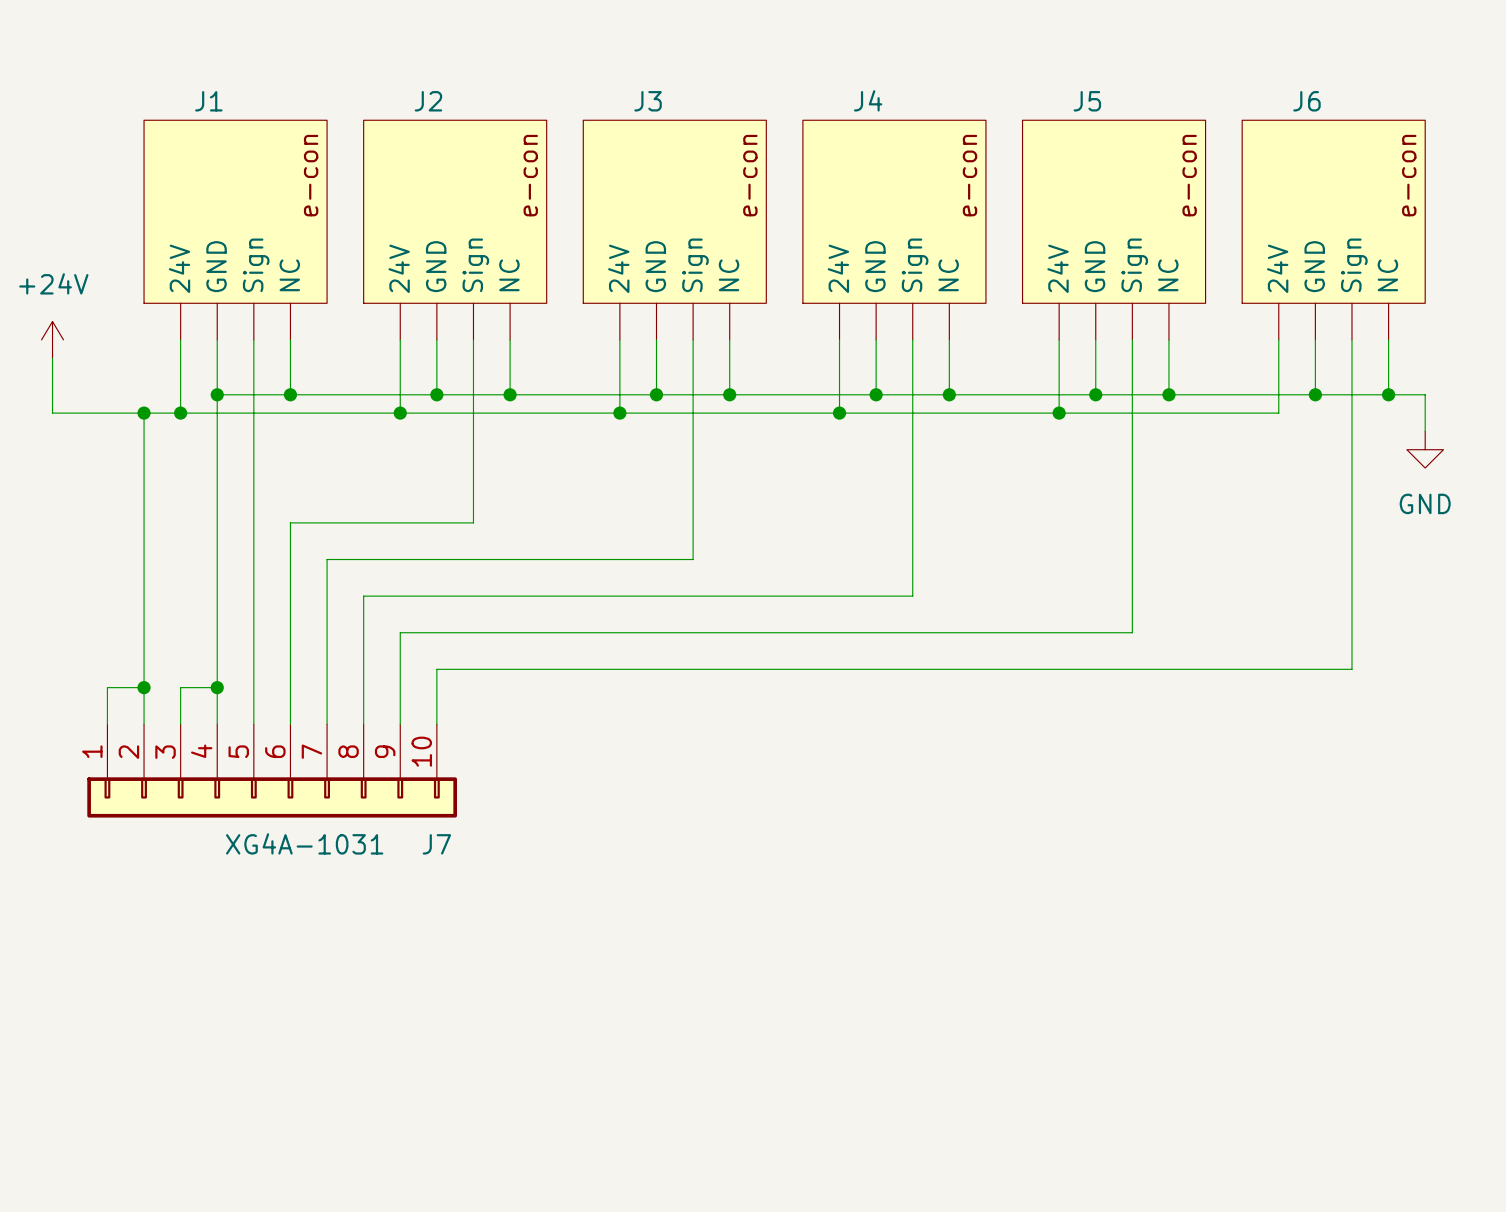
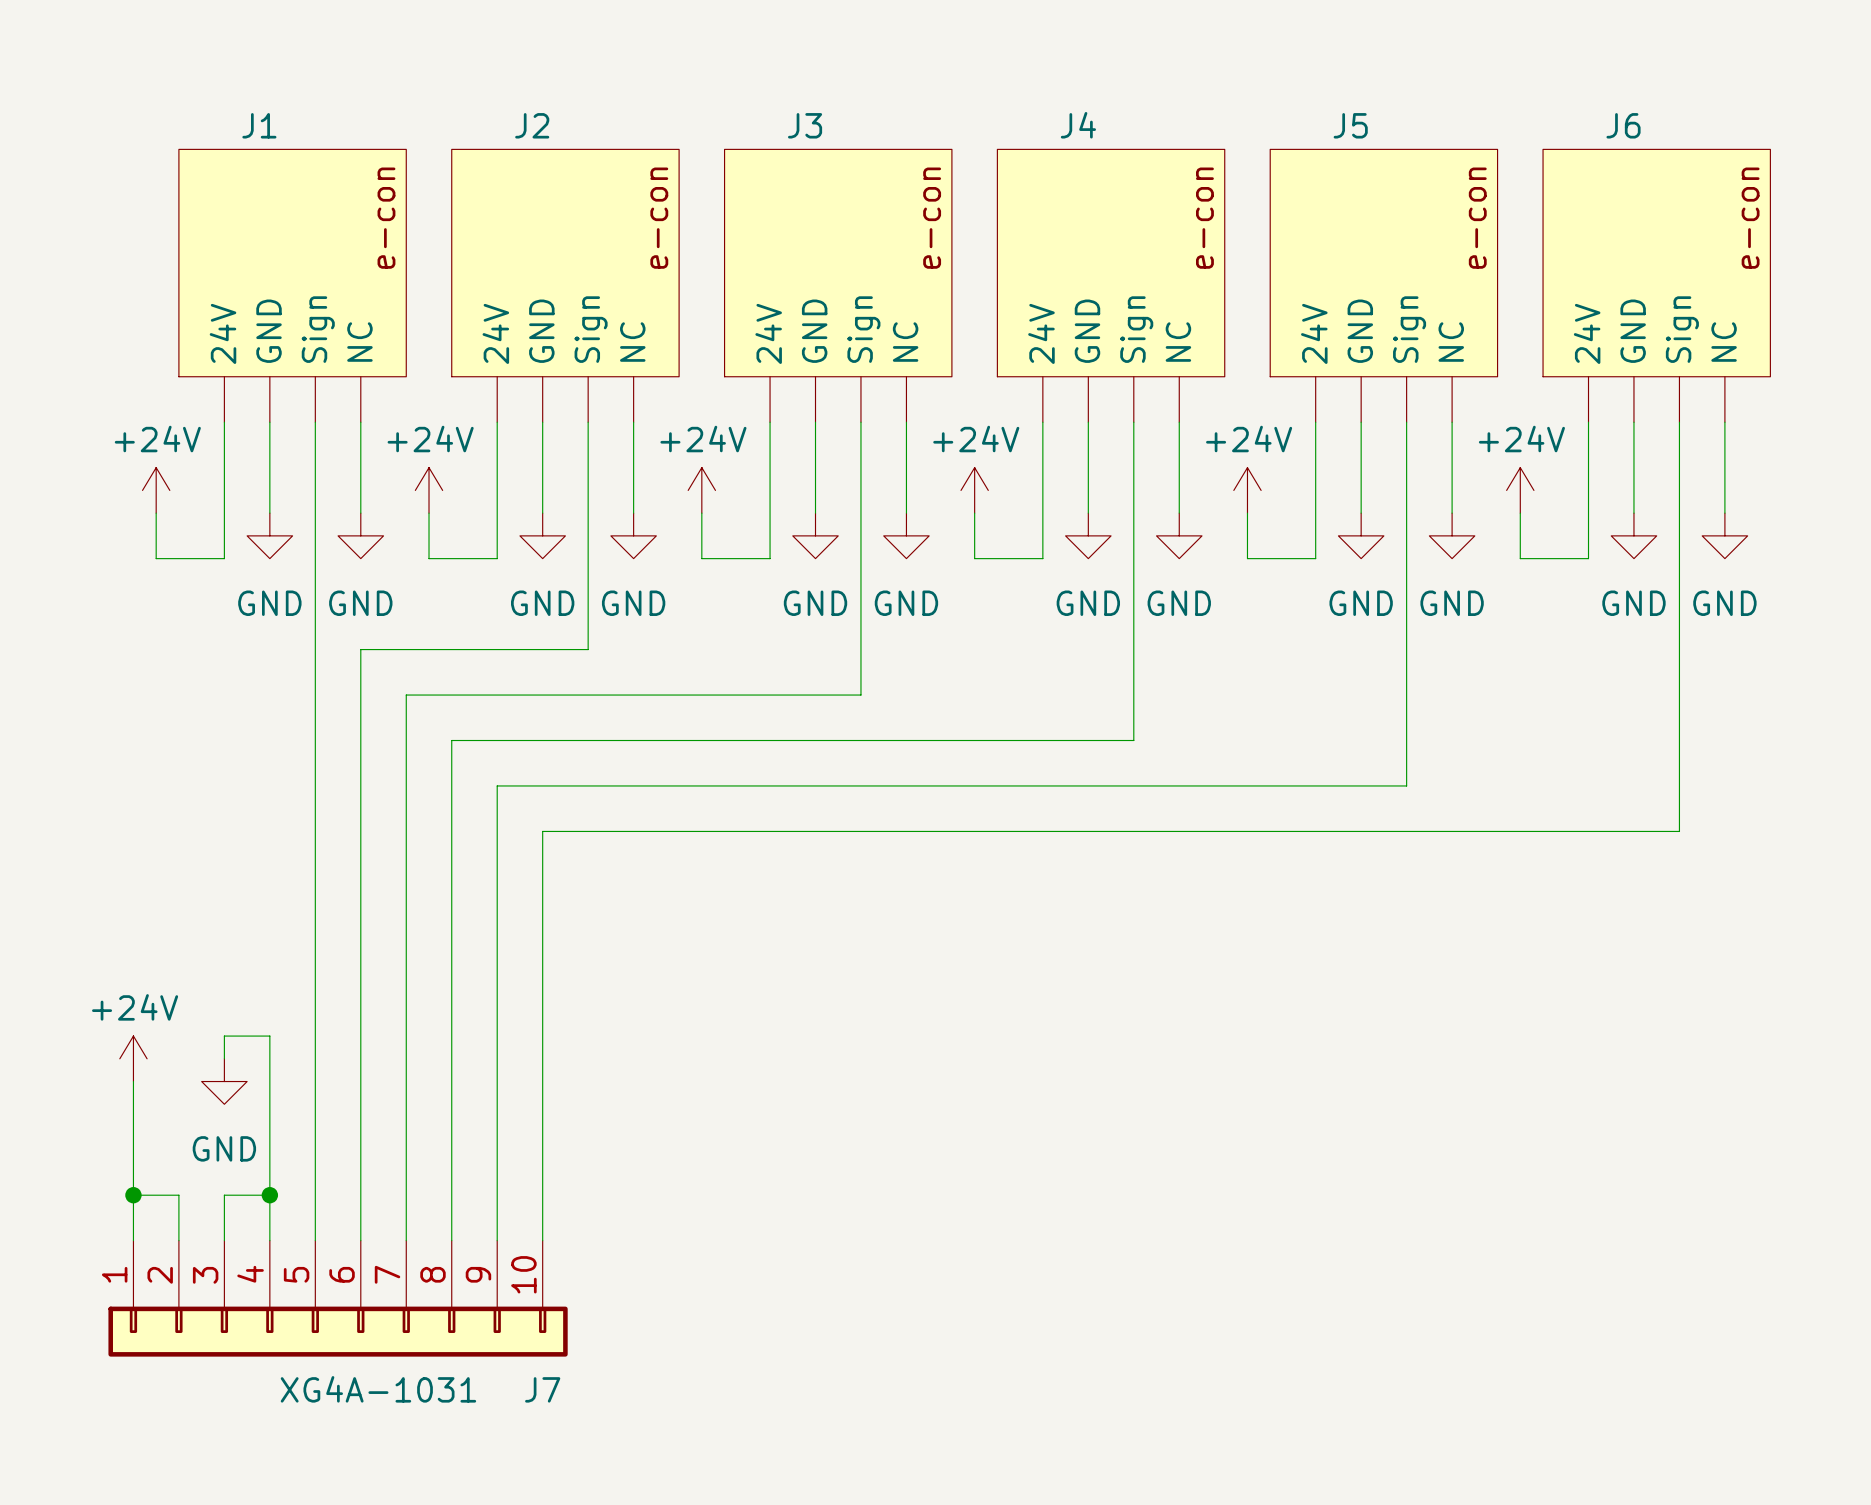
power symbol text position: +24V (53, 283) -> +24V (157, 439)
power symbol position: +24V (52, 339) -> +24V (156, 490)
wire: (52, 358) (52, 413) (1278, 413) -> (1520, 513) (1520, 558) (1588, 558) (1588, 513)
wire: (217, 394) (1425, 394) (1425, 431) -> none
junction: (217, 394) -> none
wire: none -> (360, 490) (360, 513)
junction: (290, 394) -> none
power symbol: none -> +24V (429, 490)
wire: none -> (542, 490) (542, 513)
junction: (436, 394) -> none
wire: none -> (633, 490) (633, 513)
junction: (510, 394) -> none
power symbol: none -> +24V (701, 490)
wire: none -> (815, 490) (815, 513)
junction: (656, 394) -> none
wire: none -> (906, 490) (906, 513)
junction: (729, 394) -> none
power symbol: none -> +24V (974, 490)
wire: none -> (1088, 490) (1088, 513)
junction: (876, 394) -> none
wire: none -> (1179, 490) (1179, 513)
junction: (949, 394) -> none
power symbol: none -> +24V (1247, 490)
wire: none -> (1361, 490) (1361, 513)
junction: (1095, 394) -> none
wire: none -> (1452, 490) (1452, 513)
junction: (1168, 394) -> none
power symbol: none -> +24V (1520, 490)
wire: none -> (1633, 490) (1633, 513)
junction: (1315, 394) -> none
wire: none -> (1724, 490) (1724, 513)
junction: (1388, 394) -> none
wire: none -> (156, 513) (156, 558) (224, 558) (224, 513)
wire: (144, 413) (144, 724) -> none
junction: (144, 413) -> none
junction: (180, 413) -> none
wire: (217, 413) (217, 724) -> none
wire: none -> (429, 513) (429, 558) (497, 558) (497, 513)
junction: (400, 413) -> none
wire: none -> (701, 513) (701, 558) (770, 558) (770, 513)
junction: (619, 413) -> none
wire: none -> (974, 513) (974, 558) (1042, 558) (1042, 513)
junction: (839, 413) -> none
wire: none -> (1247, 513) (1247, 558) (1315, 558) (1315, 513)
junction: (1059, 413) -> none
power symbol: none -> GND (269, 535)
power symbol: none -> GND (360, 535)
power symbol: none -> GND (542, 535)
power symbol: none -> GND (633, 535)
power symbol: none -> GND (815, 535)
power symbol: none -> GND (906, 535)
power symbol: none -> GND (1088, 535)
power symbol: none -> GND (1179, 535)
power symbol: none -> GND (1361, 535)
power symbol: none -> GND (1452, 535)
power symbol: none -> GND (1633, 535)
power symbol position: GND (1425, 449) -> GND (1724, 535)
wire: (144, 687) (107, 687) (107, 724) -> none
junction: (144, 687) -> none
wire: (217, 687) (180, 687) (180, 724) -> (269, 1195) (224, 1195) (224, 1240)
junction: (217, 687) -> none
wire: none -> (315, 899) (315, 1240)
wire: none -> (360, 899) (360, 1240)
wire: none -> (406, 899) (406, 1240)
wire: none -> (451, 899) (451, 1240)
wire: none -> (497, 899) (497, 1240)
wire: none -> (542, 899) (542, 1240)
J7 position: (272, 770) -> (338, 1298)
power symbol: none -> +24V (133, 1058)
wire: none -> (224, 1058) (224, 1036) (269, 1036) (269, 1240)
wire: none -> (133, 1081) (133, 1240)
power symbol: none -> GND (224, 1081)
wire: none -> (133, 1195) (178, 1195) (178, 1240)
junction: none -> (133, 1195)
junction: none -> (269, 1195)

